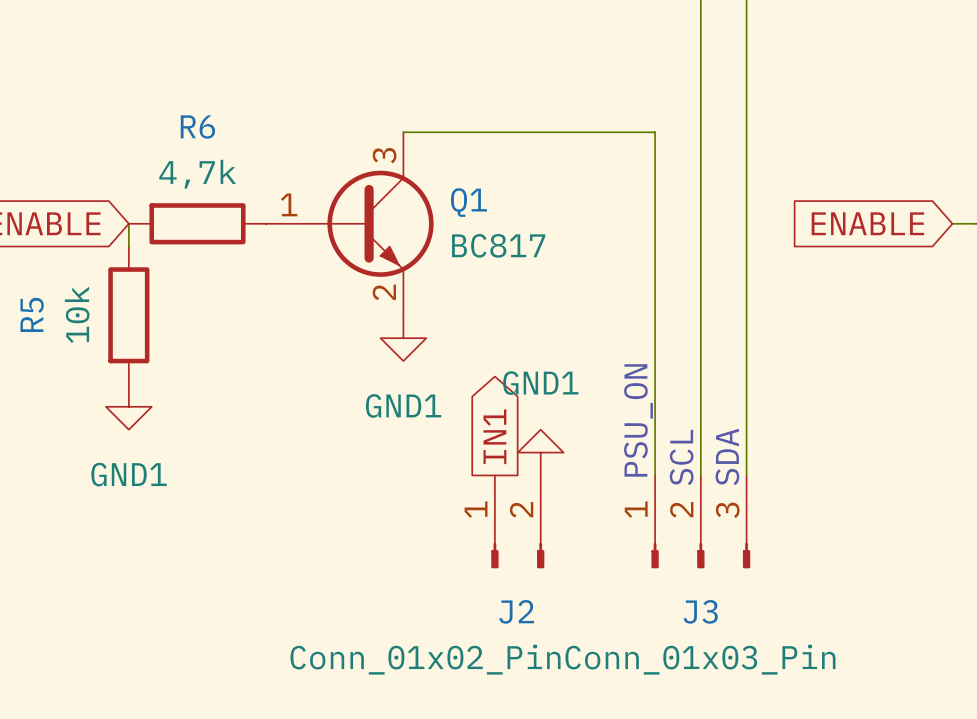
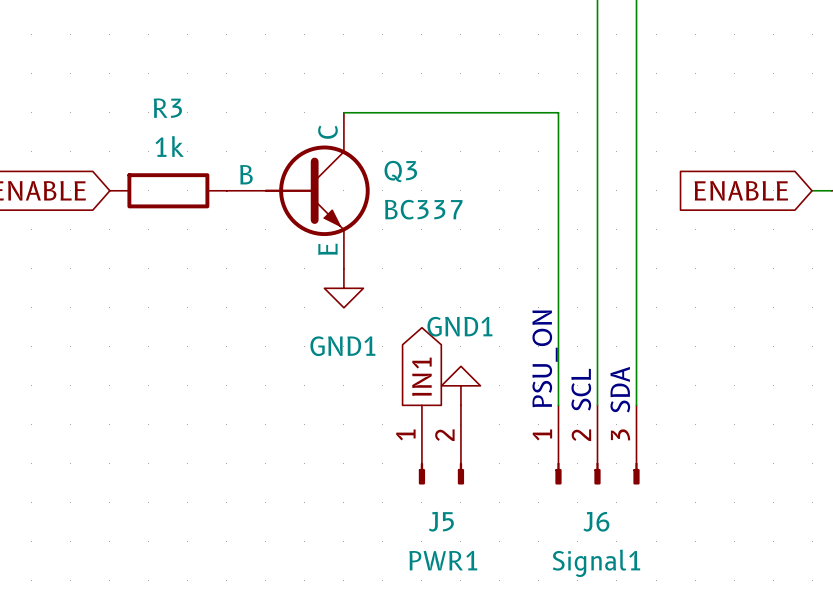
R6 name: R6 (197, 127) -> R3 (167, 108)
R6 value: 4,7k (197, 174) -> 1k (169, 146)
wire: (128, 223) (128, 246) -> none
Q1: BC817 (349, 223) -> none
Q3: none -> BC337 (298, 190)
R5: 10k (128, 315) -> none
power symbol: GND1 (128, 406) -> none
J2 name: J2 (516, 611) -> J5 (441, 521)
J3 name: J3 (700, 611) -> J6 (596, 521)
J2 value: Conn_01x02_Pin (425, 659) -> PWR1 (443, 560)
J3 value: Conn_01x03_Pin (700, 659) -> Signal1 (596, 563)

